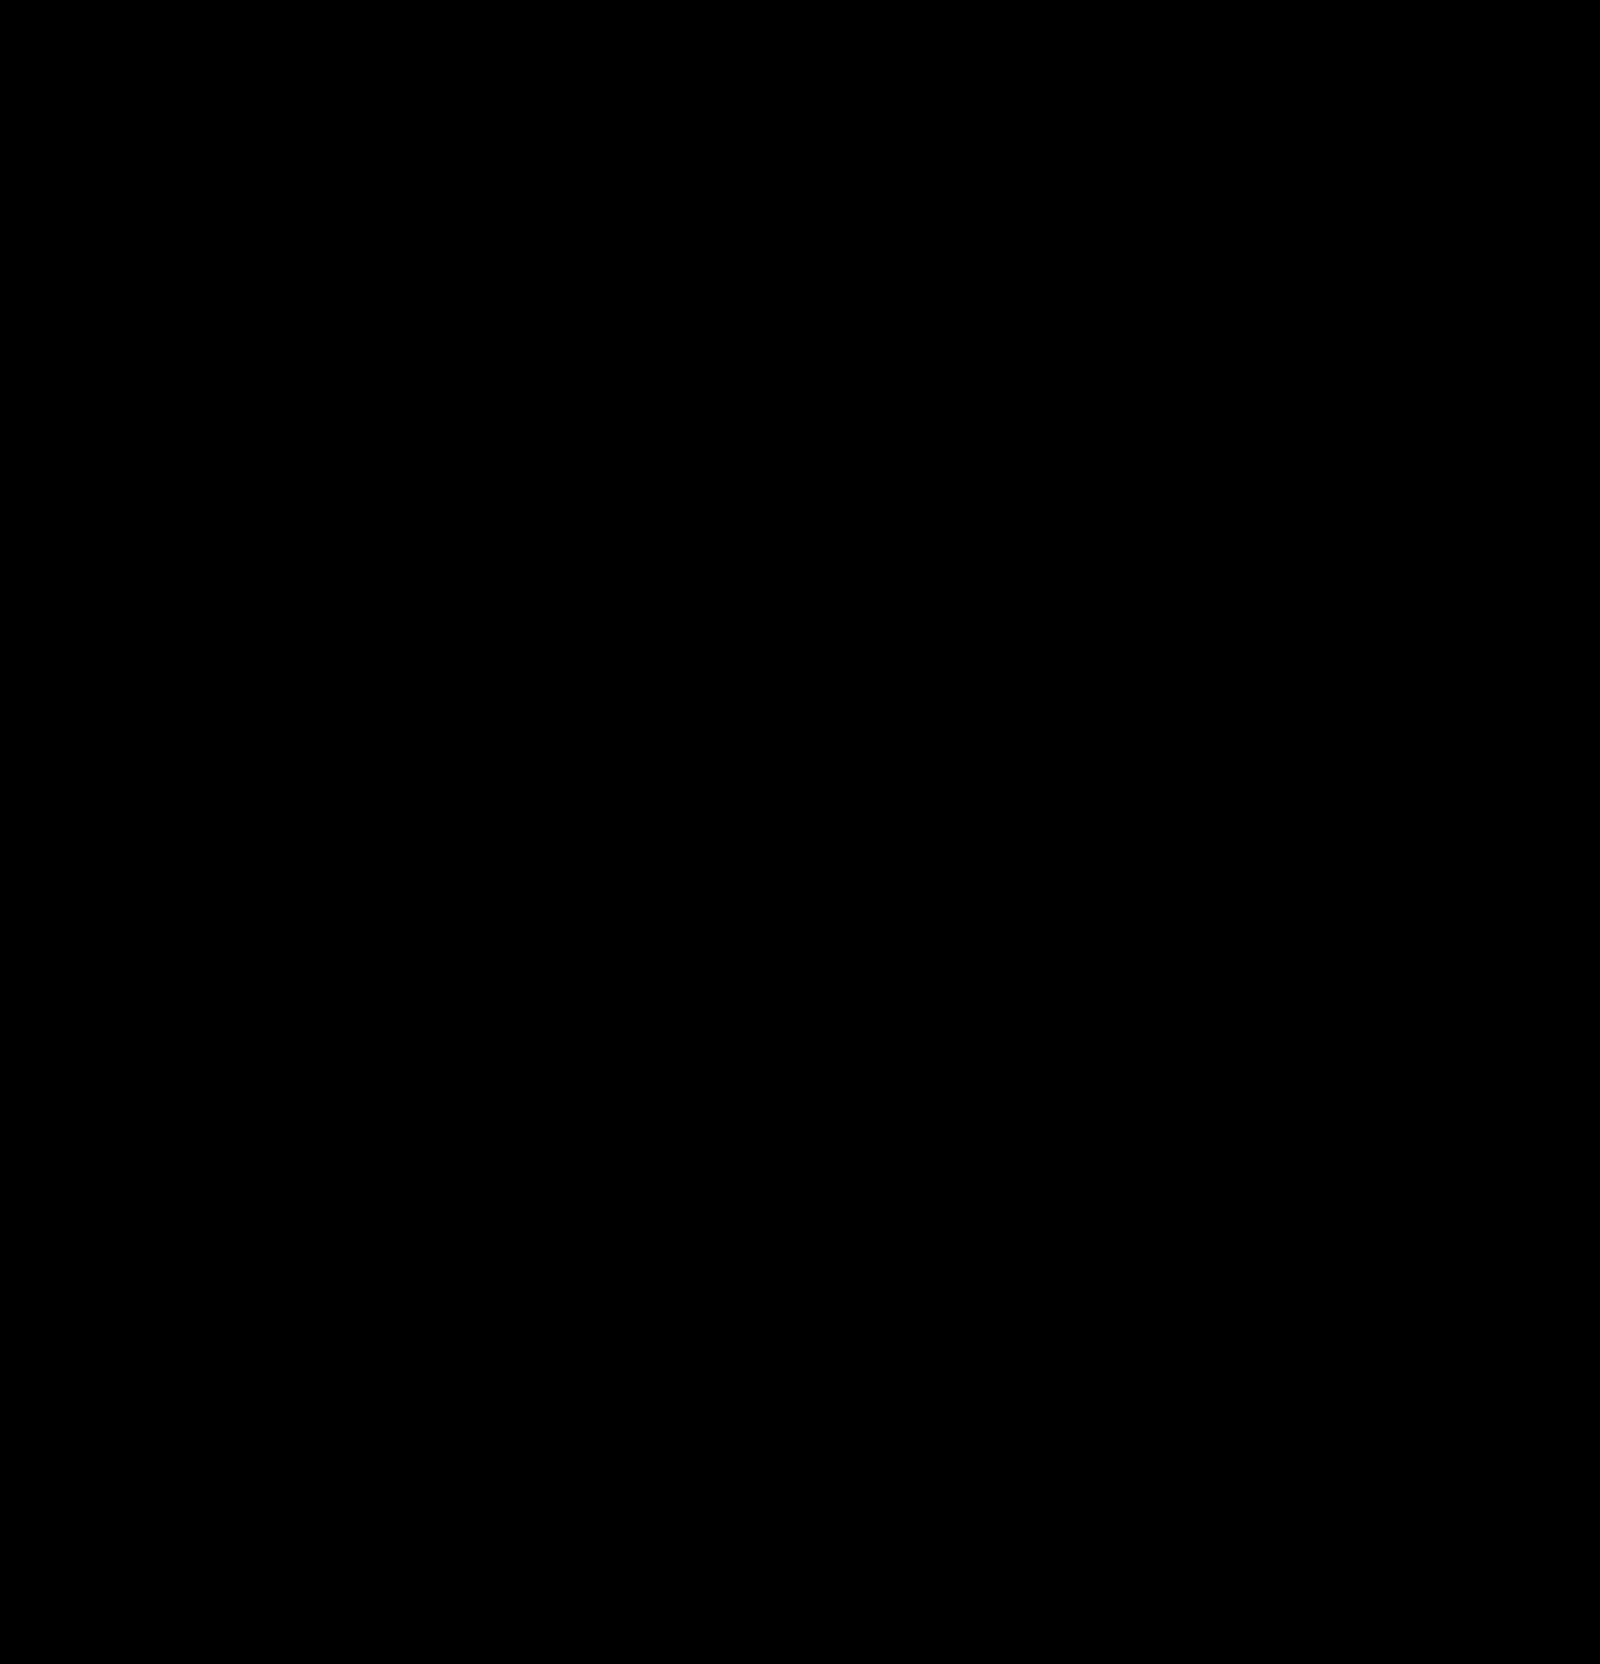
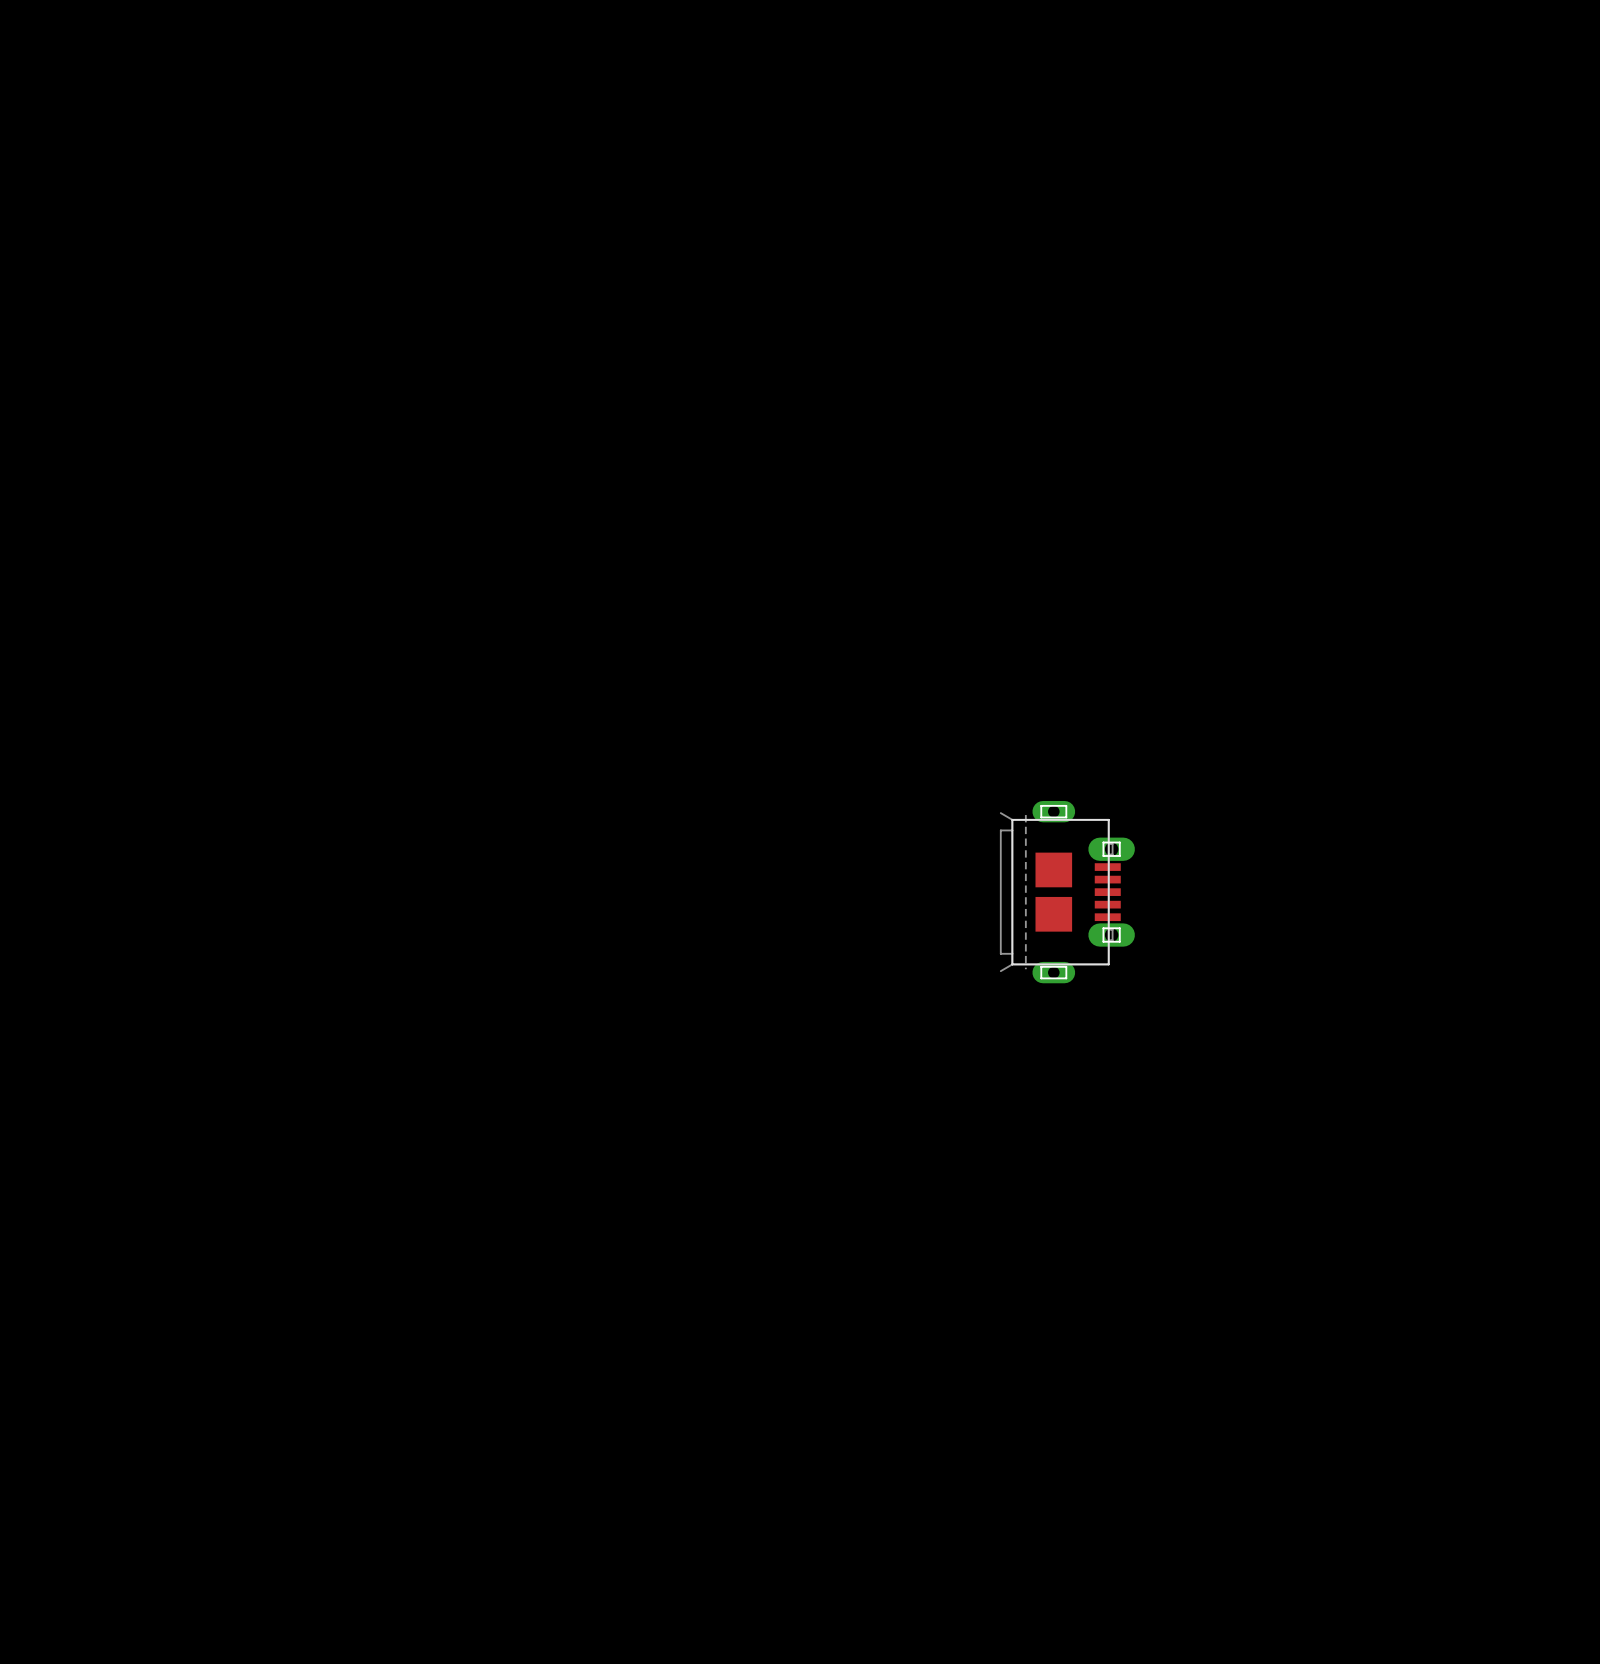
part: none -> (1067, 892)

